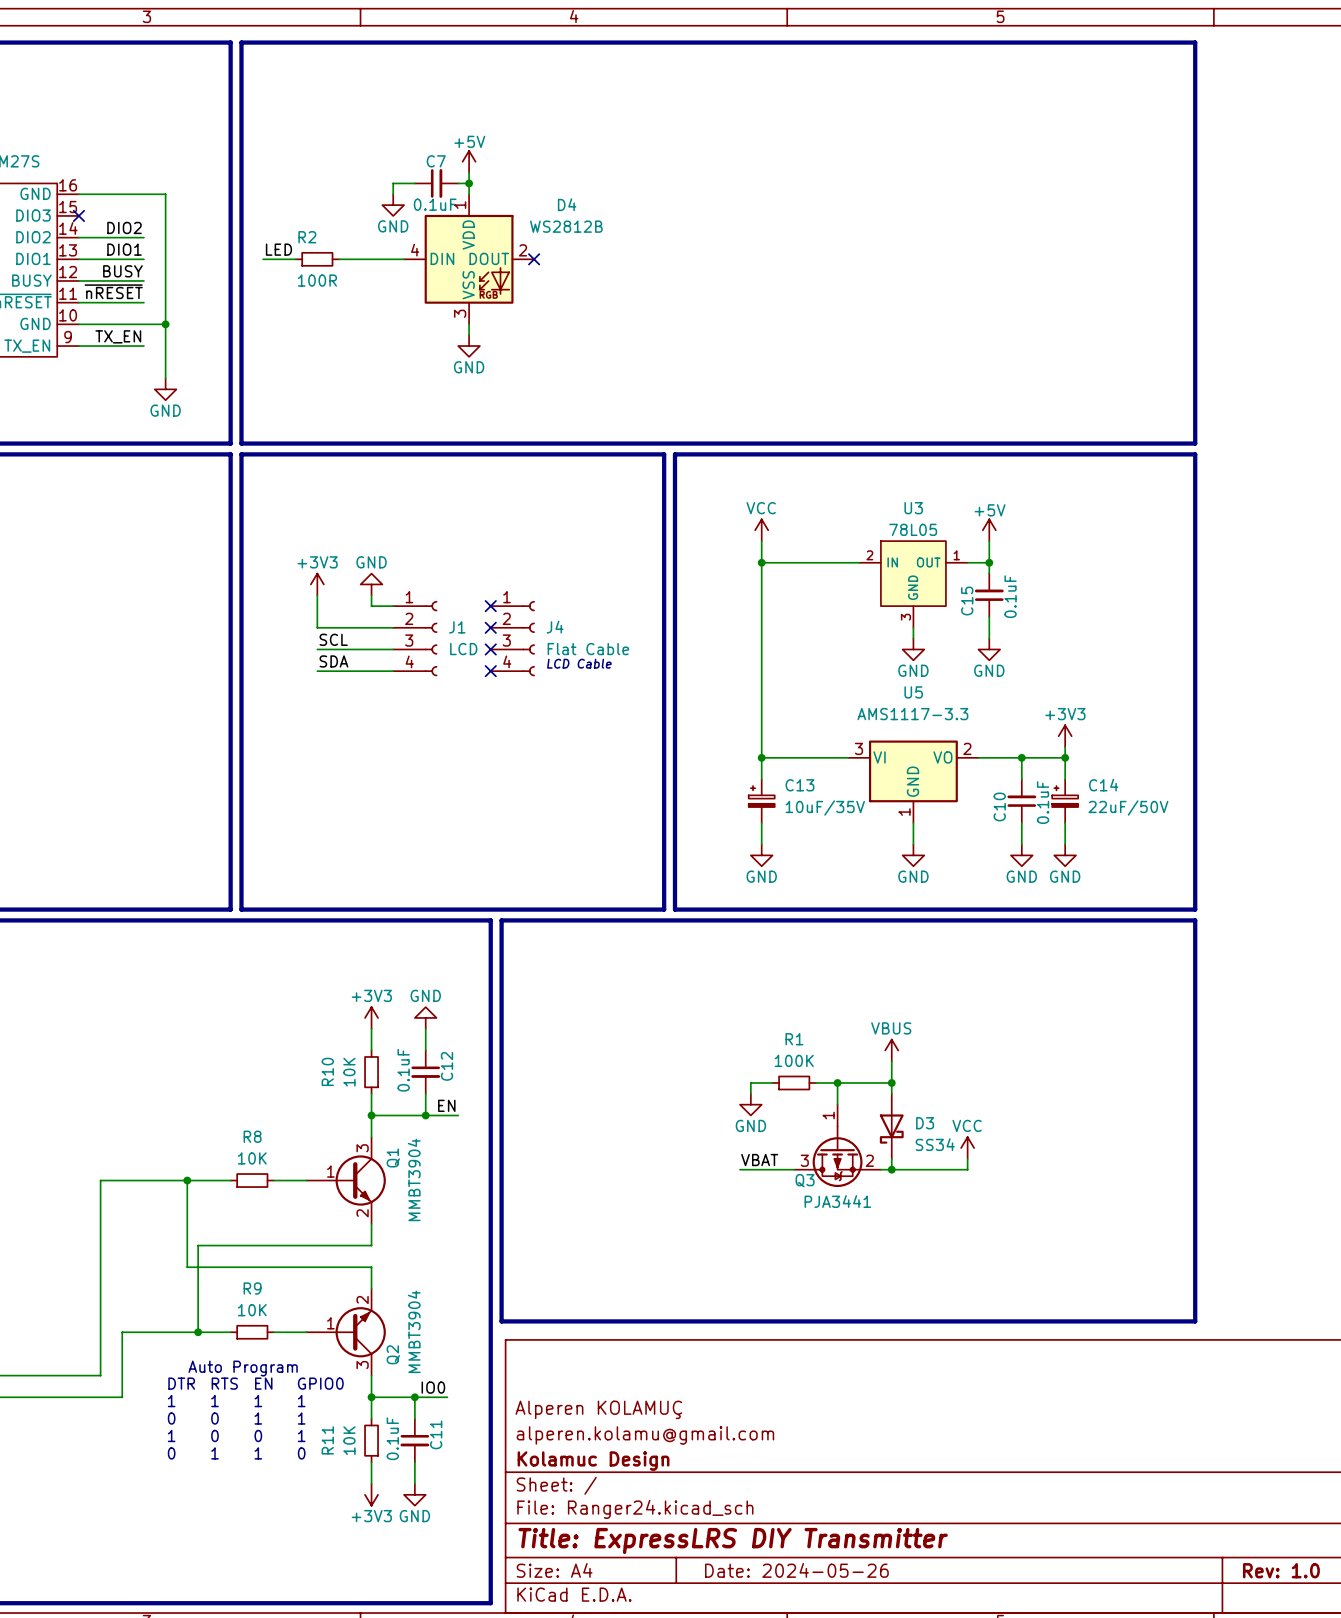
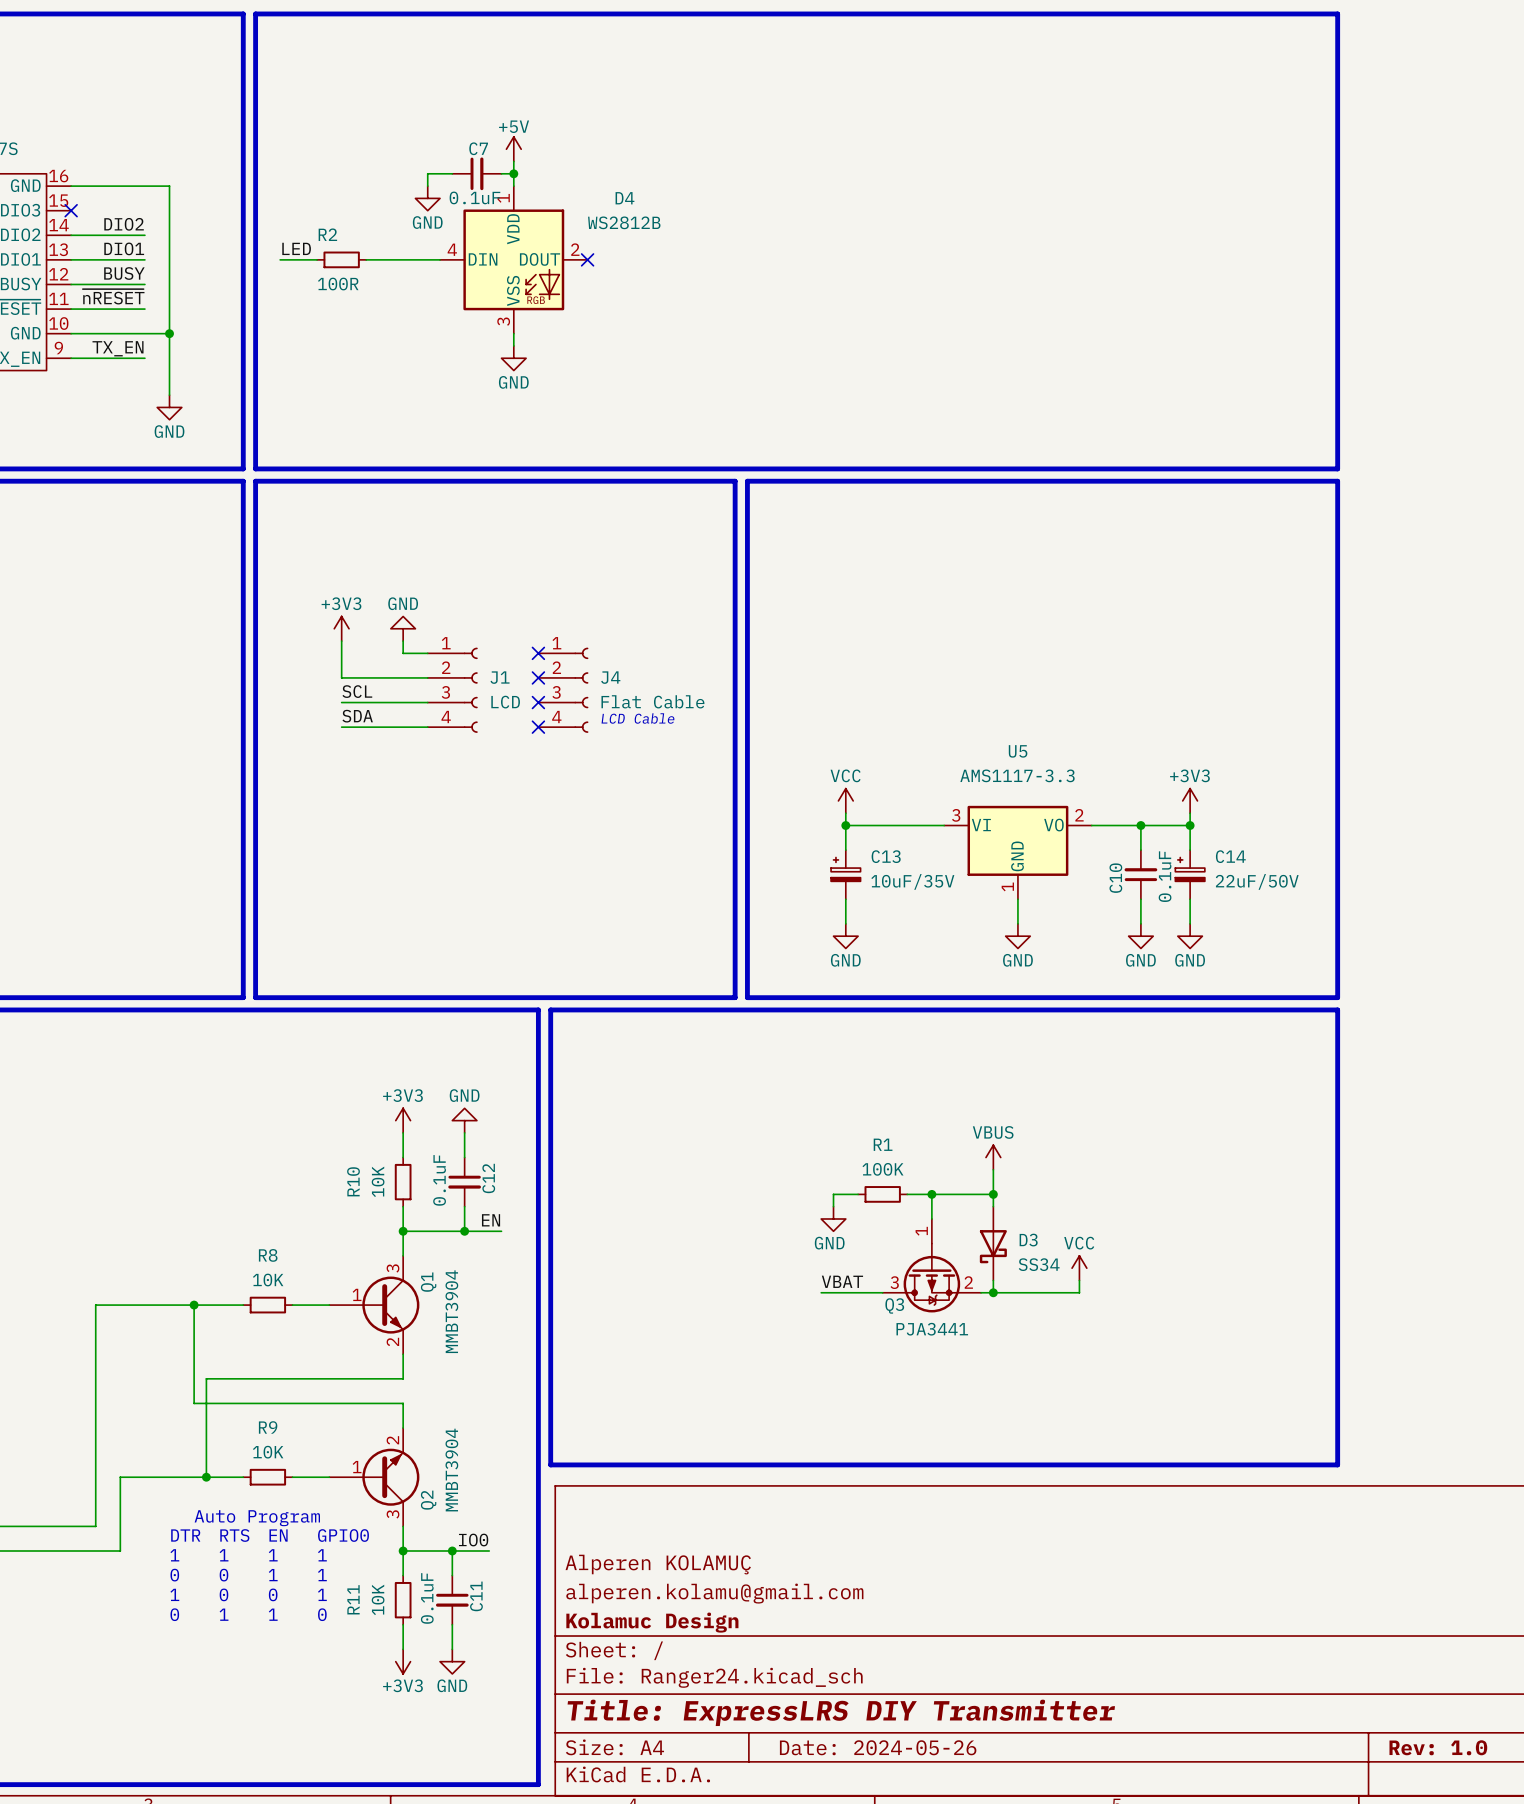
power symbol position: VCC (761, 530) -> VCC (845, 800)
power symbol: +5V (989, 530) -> none
wire: (761, 541) (761, 747) -> none
wire: (989, 541) (989, 573) -> none
wire: (761, 562) (859, 562) -> none
junction: (761, 562) -> none
wire: (967, 562) (989, 562) -> none
junction: (989, 562) -> none
U3: 78L05 (913, 584) -> none
C15: 0.1uF (989, 595) -> none
wire: (989, 616) (989, 638) -> none
wire: (913, 627) (913, 638) -> none
power symbol: GND (913, 649) -> none
power symbol: GND (989, 649) -> none

